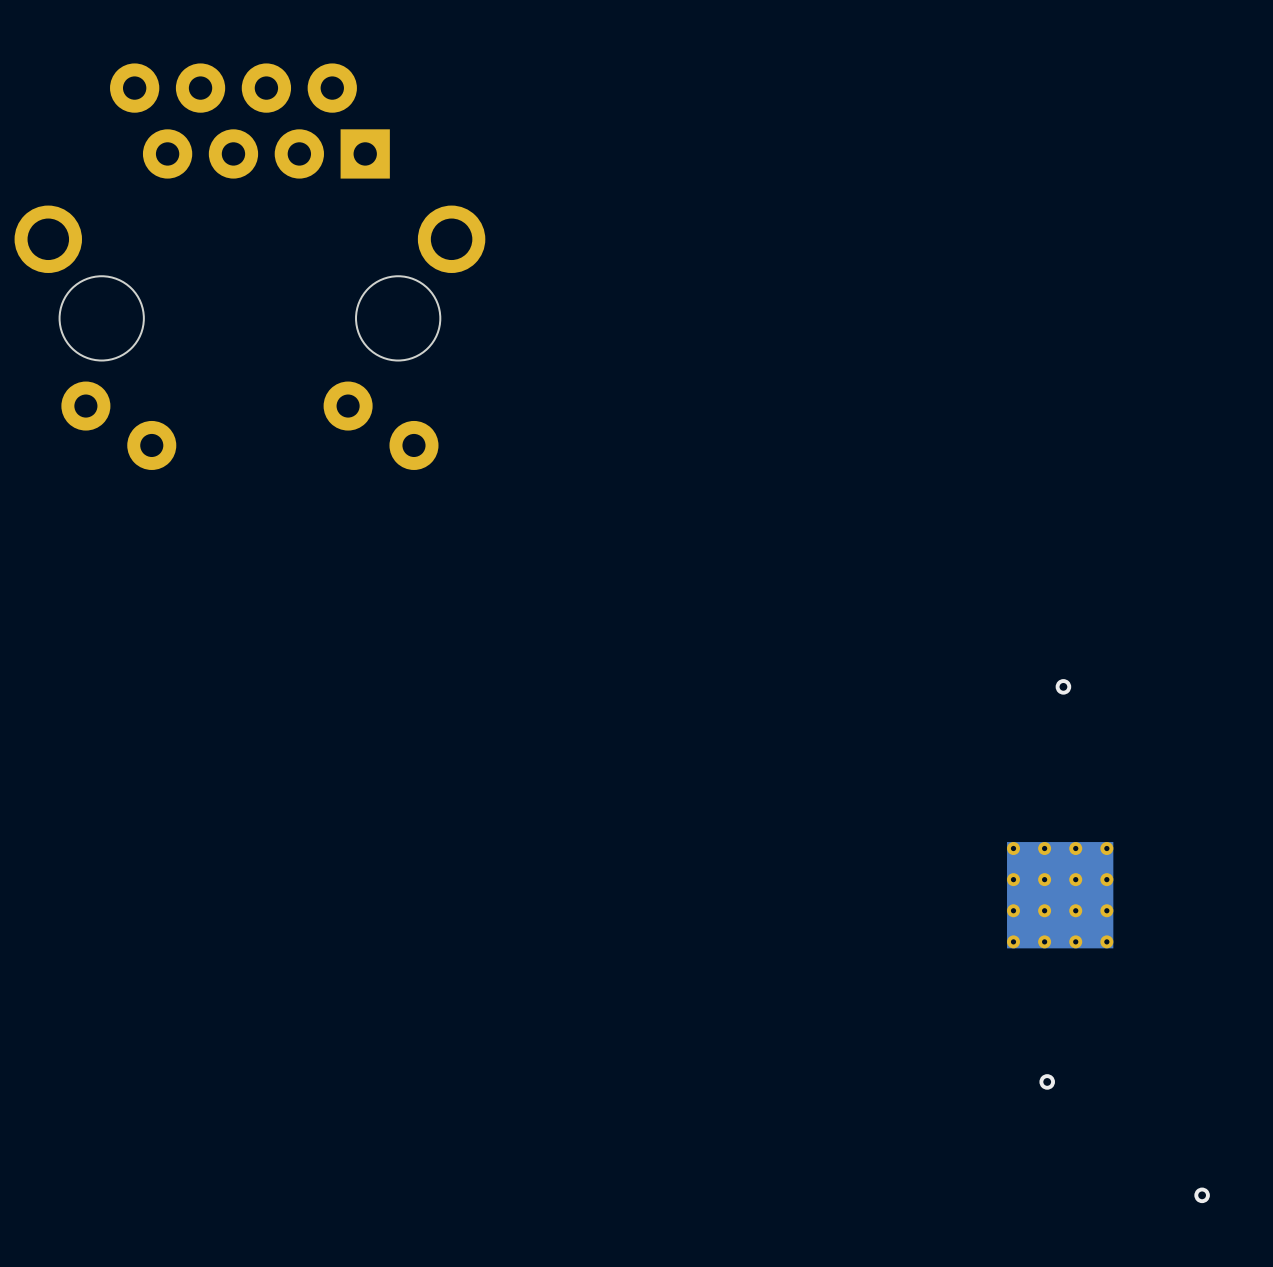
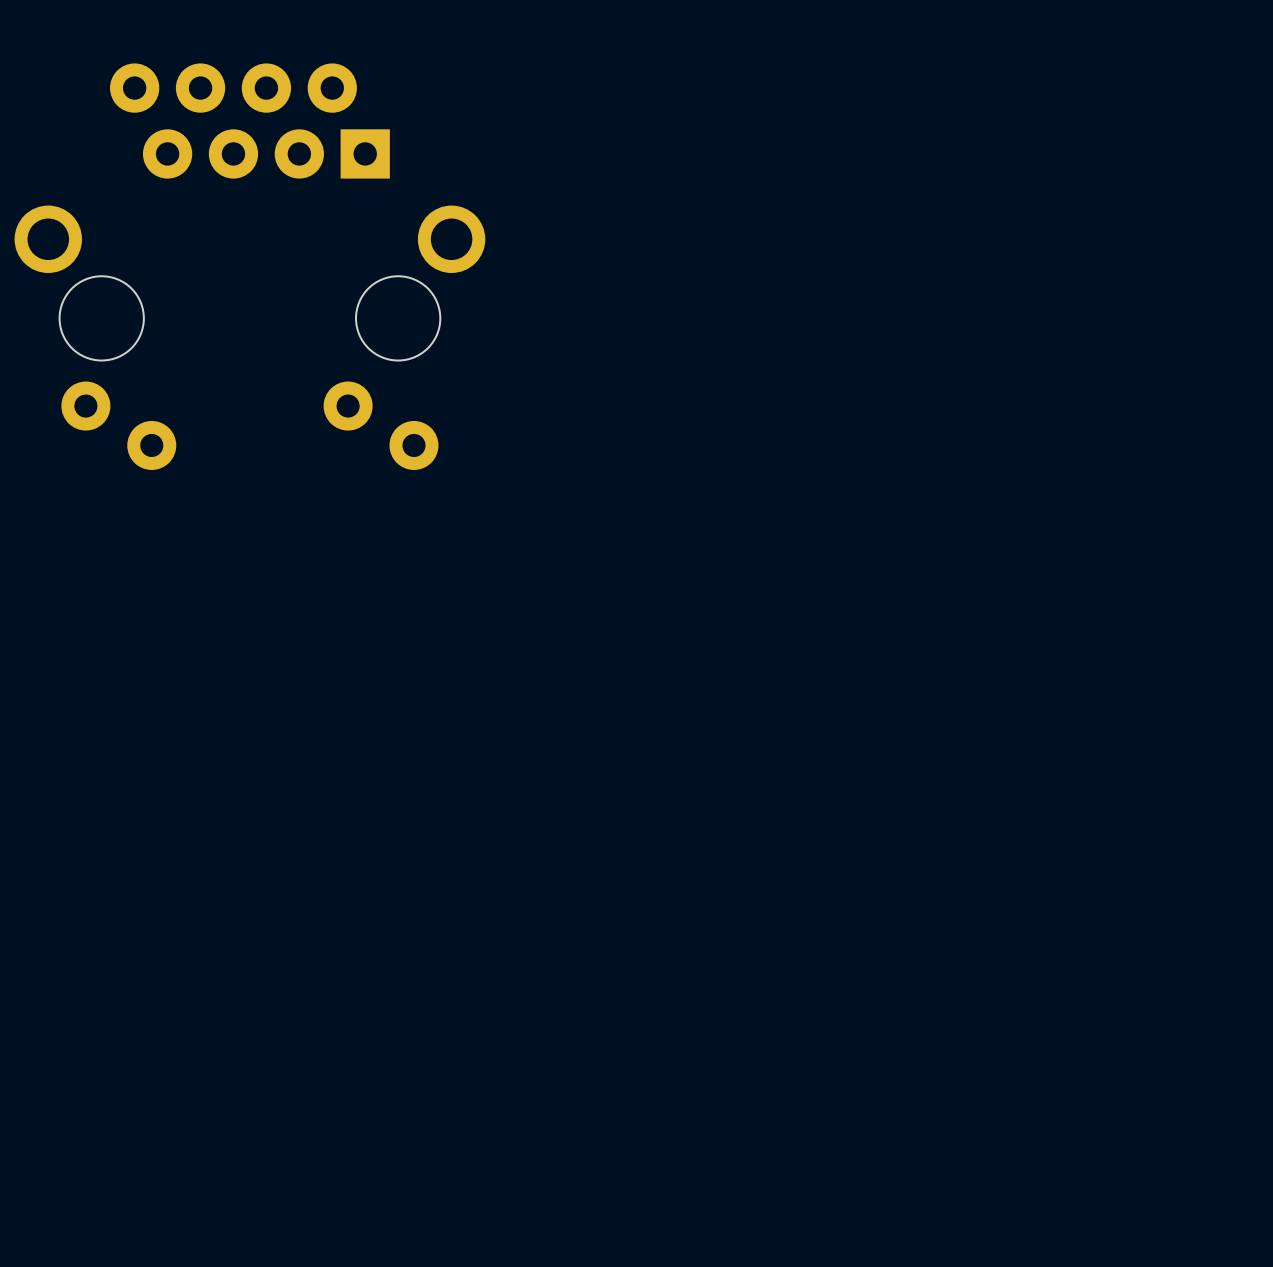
via: (1063, 686) -> none
part: (1060, 895) -> none
via: (1047, 1081) -> none
via: (1202, 1195) -> none

